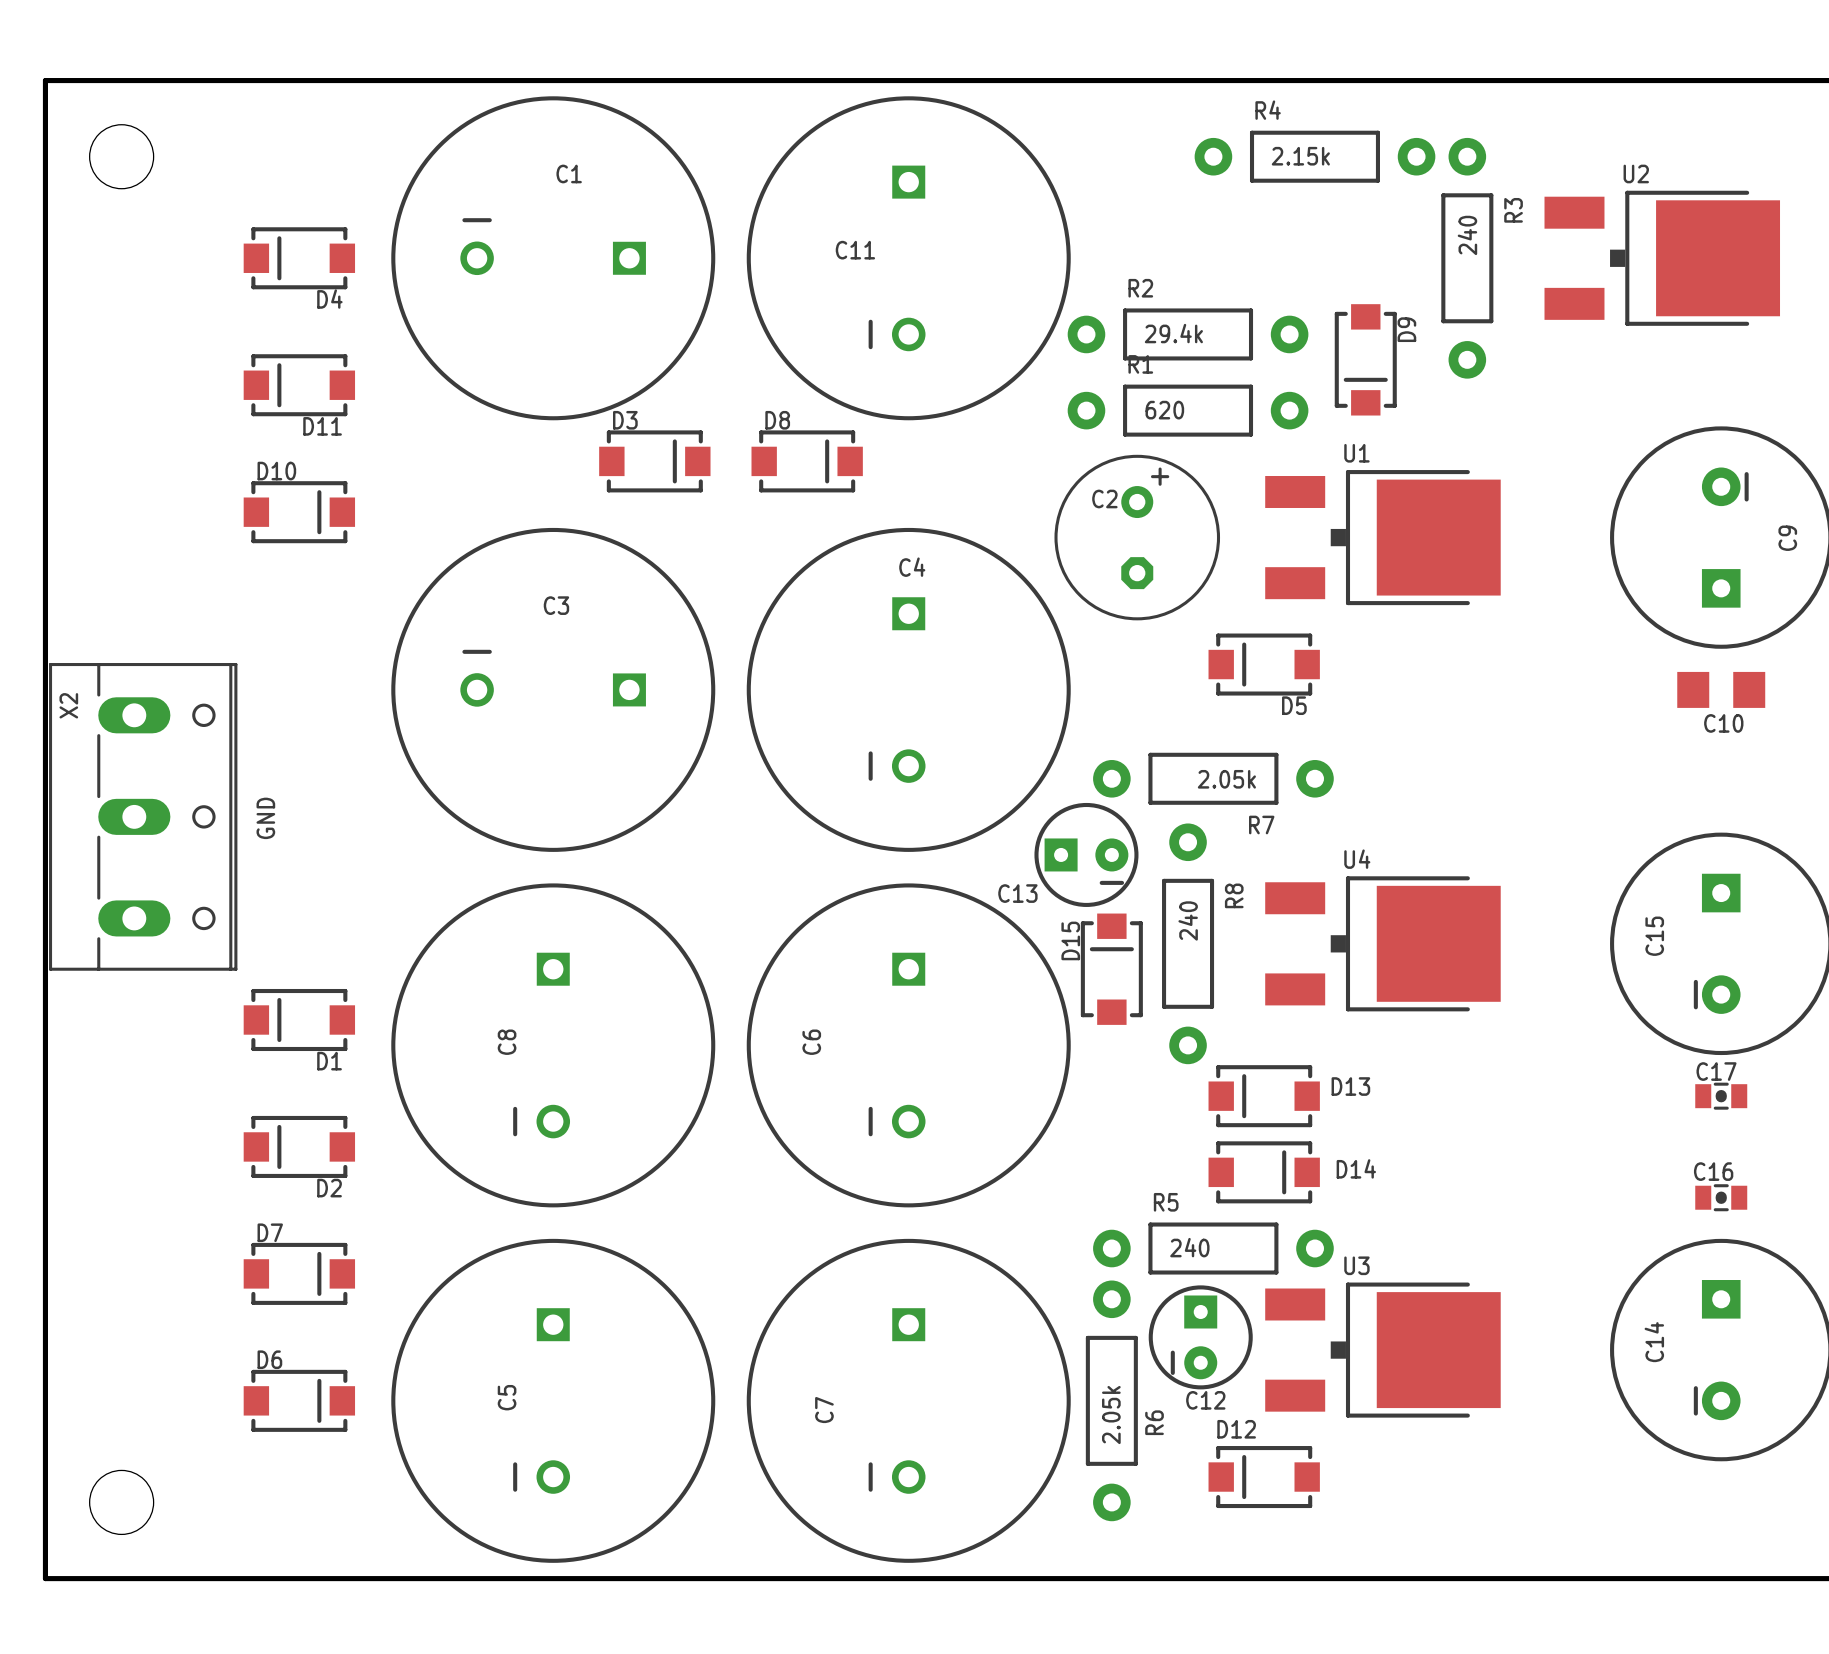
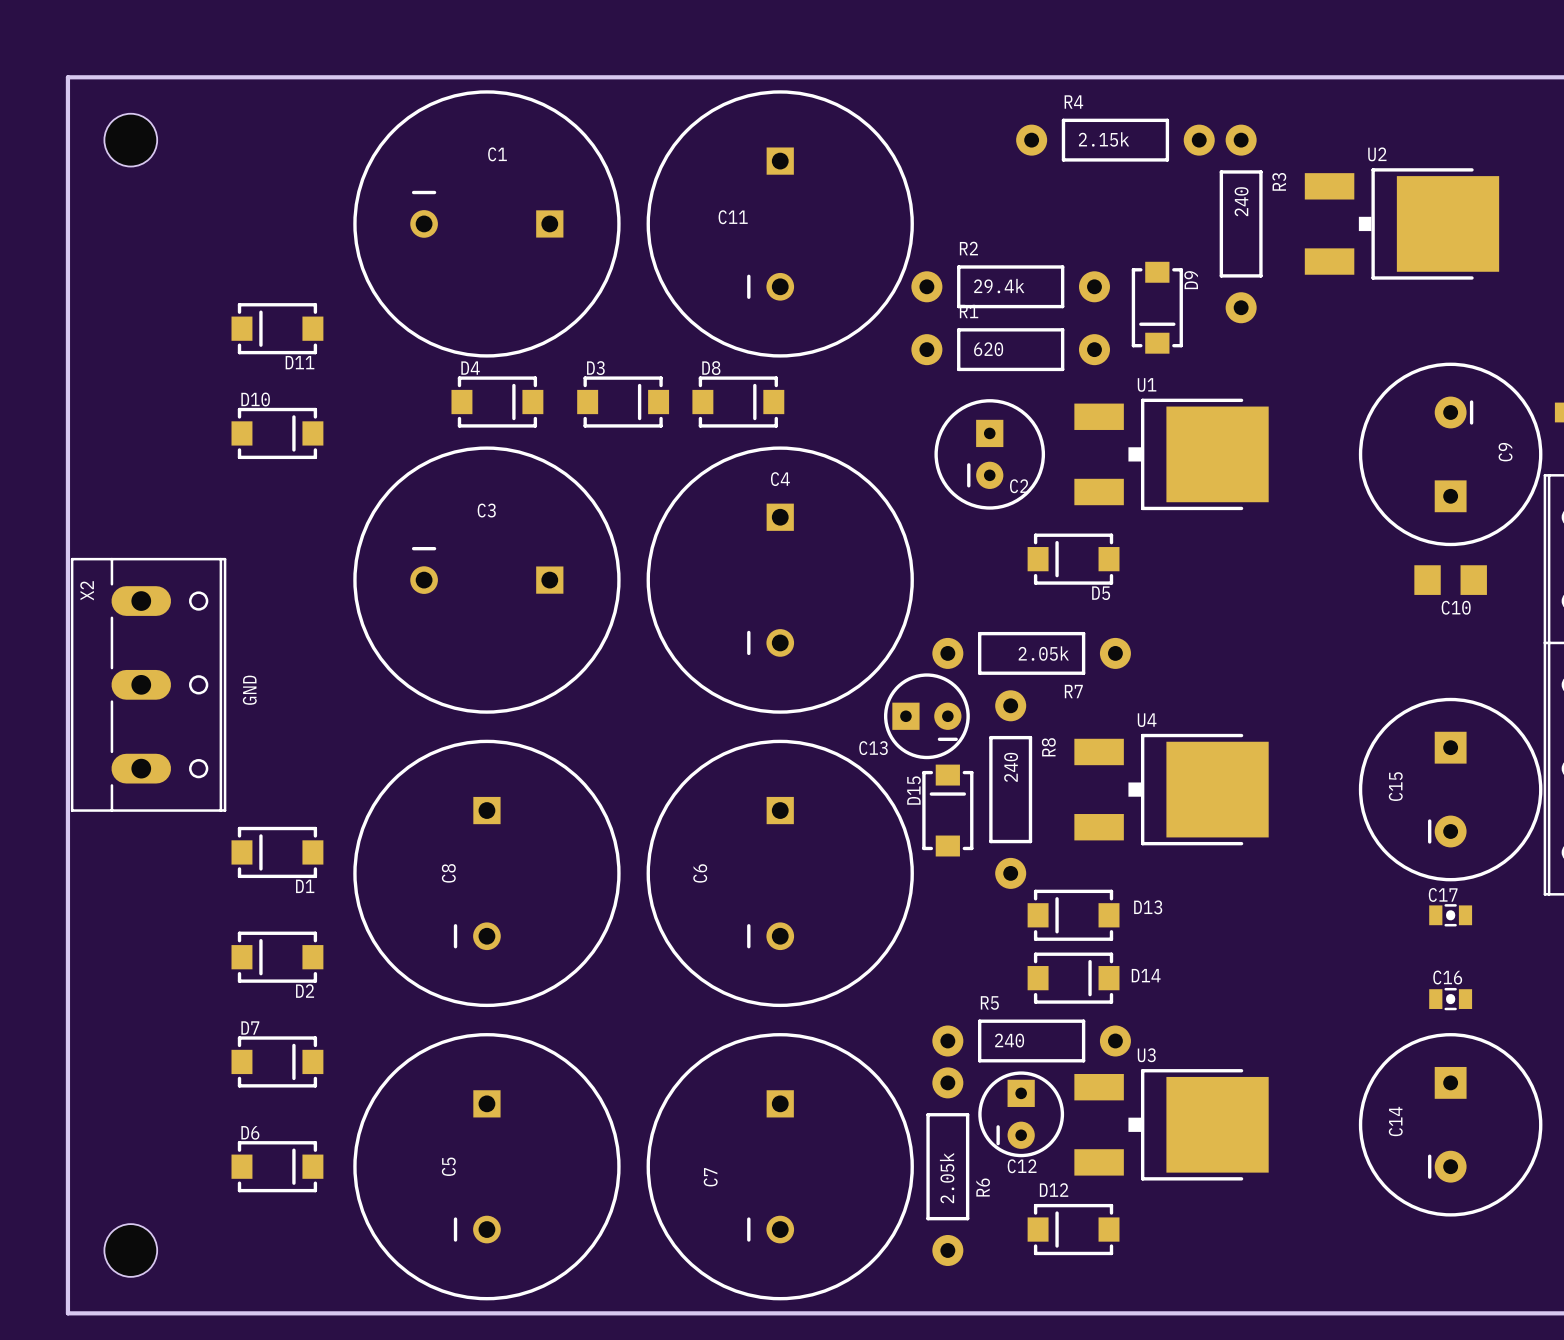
D4 rotation: 0° (299, 258) -> 180° (497, 402)
D4 position: (299, 258) -> (497, 402)
C2 footprint: [1054, 454, 1221, 621] -> [934, 399, 1046, 510]
D3 position: (654, 461) -> (623, 402)
D8 position: (807, 461) -> (738, 402)
C2 name position: C2 (1104, 498) -> C2 (1019, 486)

